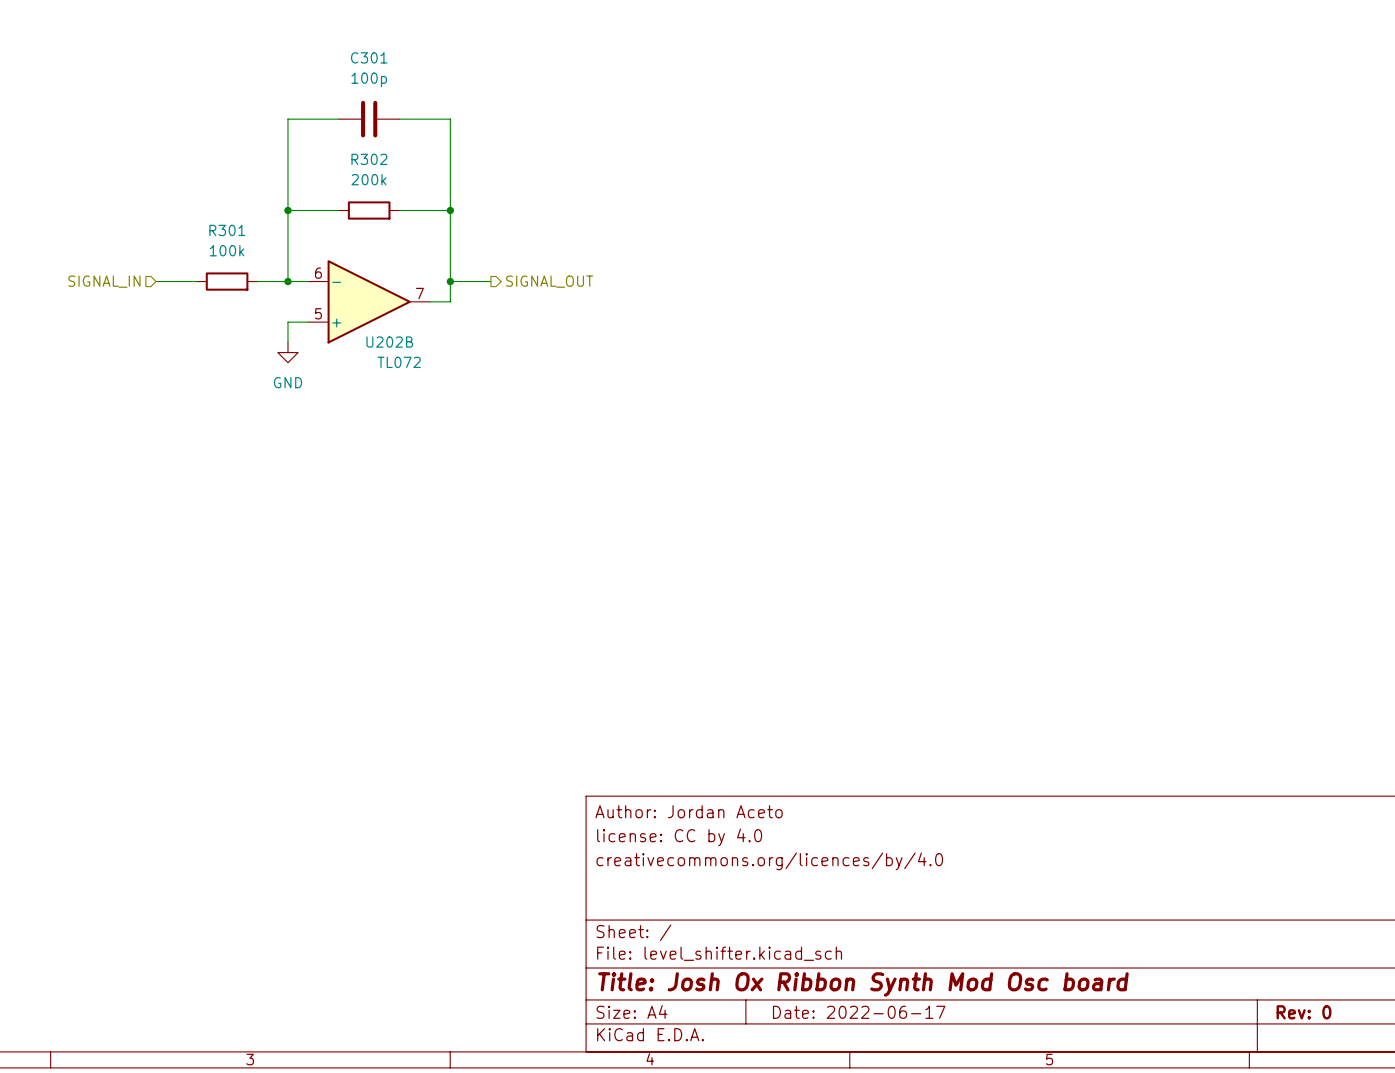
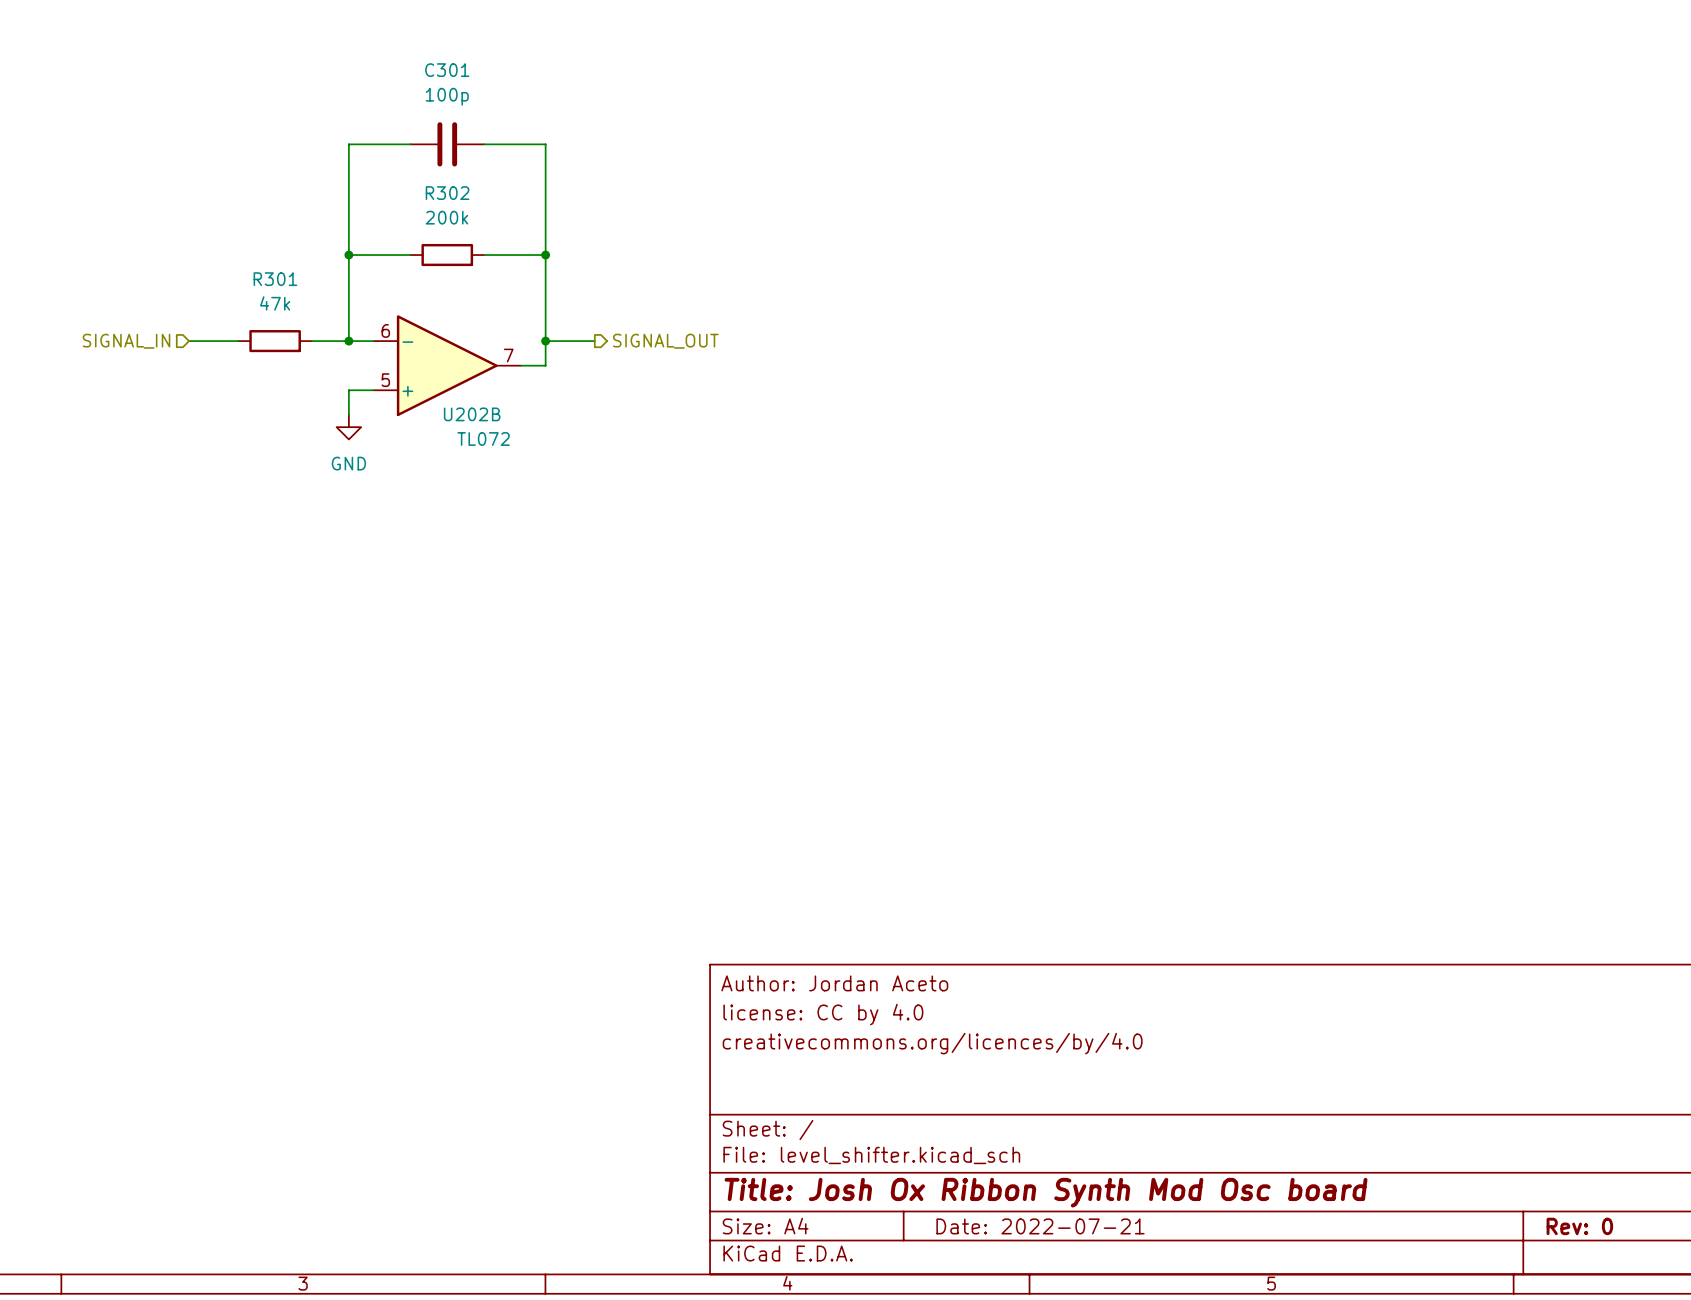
R301 value: 100k (227, 250) -> 47k (275, 303)
title block: Date: 2022-06-17 (859, 1012) -> Date: 2022-07-21 (1040, 1226)

